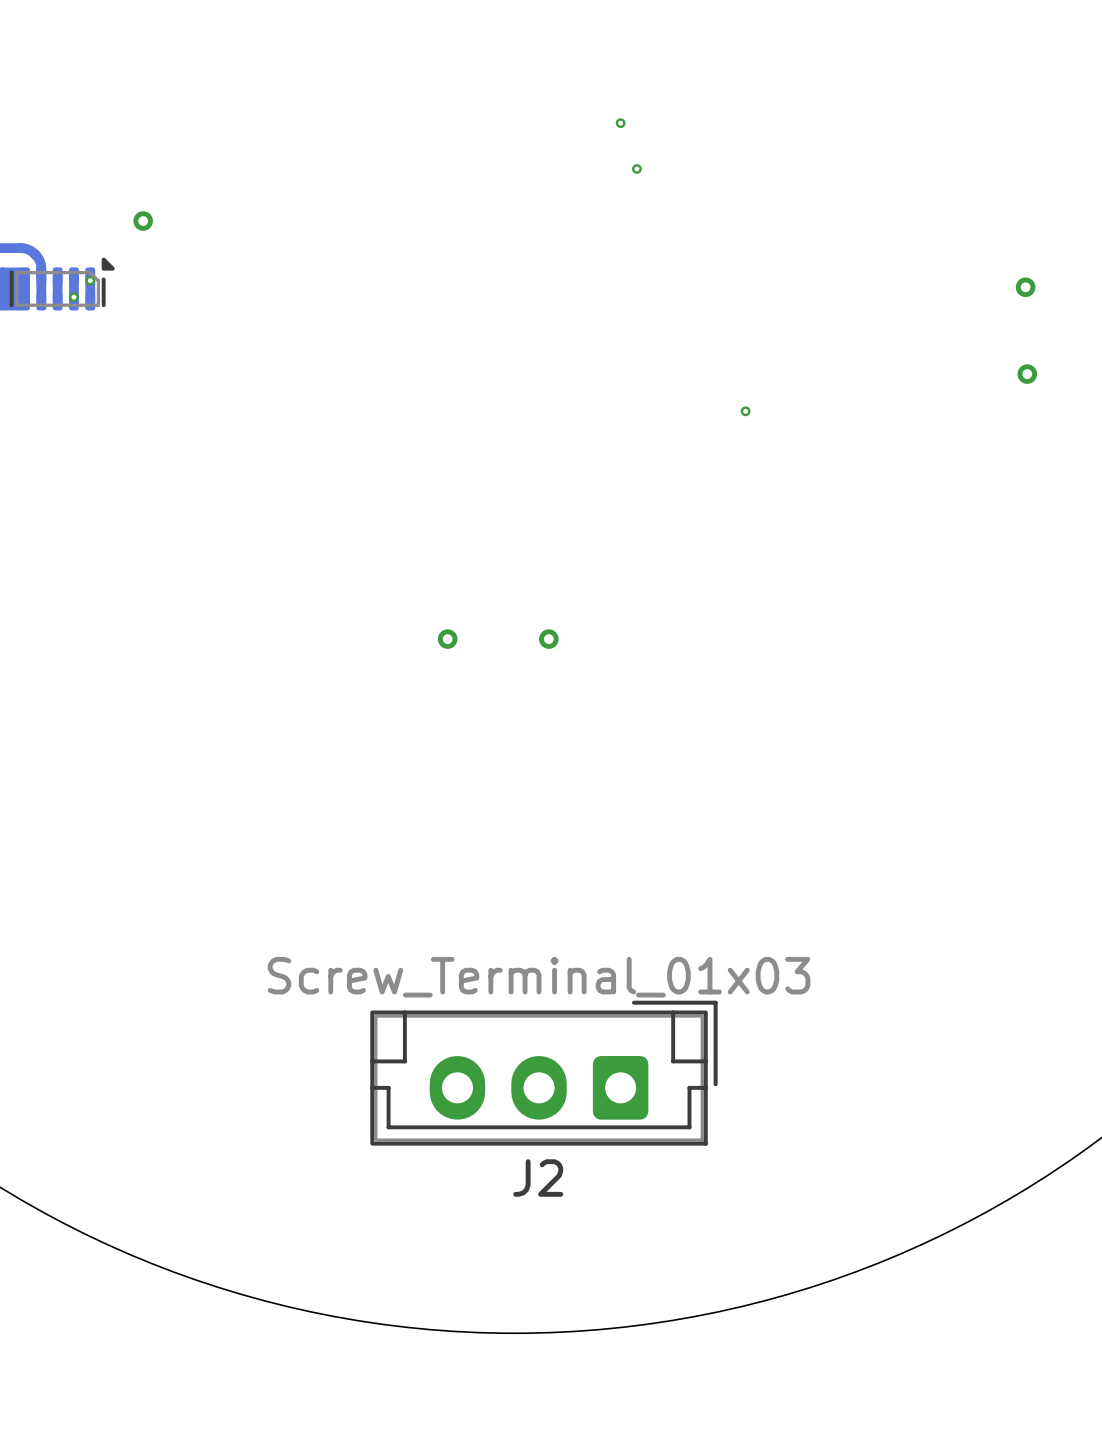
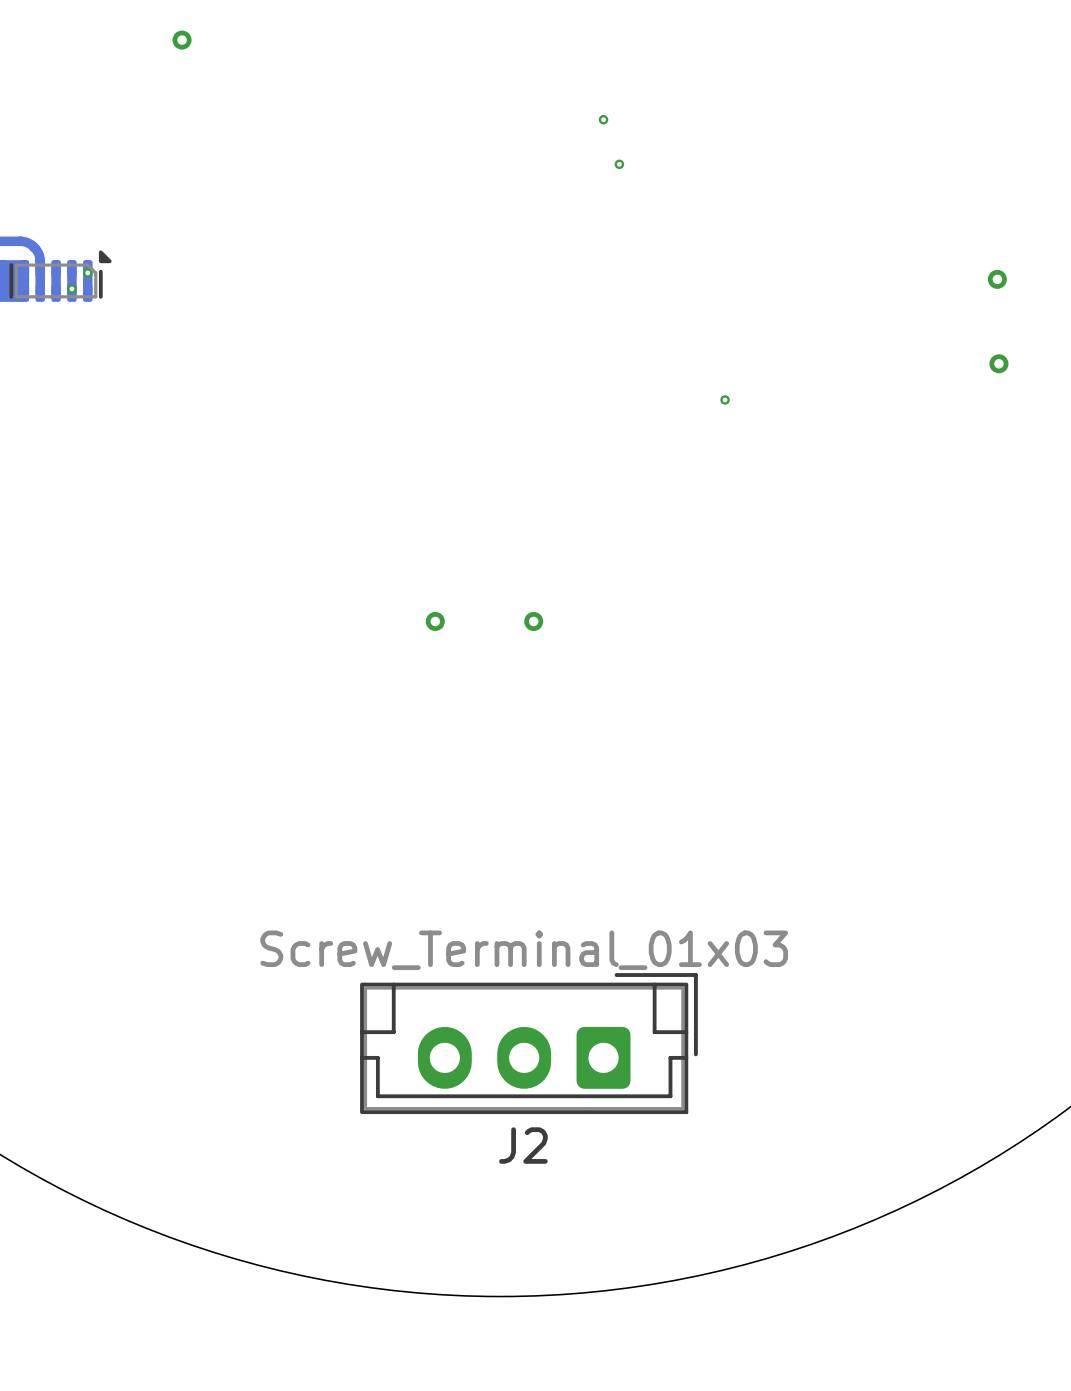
via position: (143, 221) -> (182, 40)

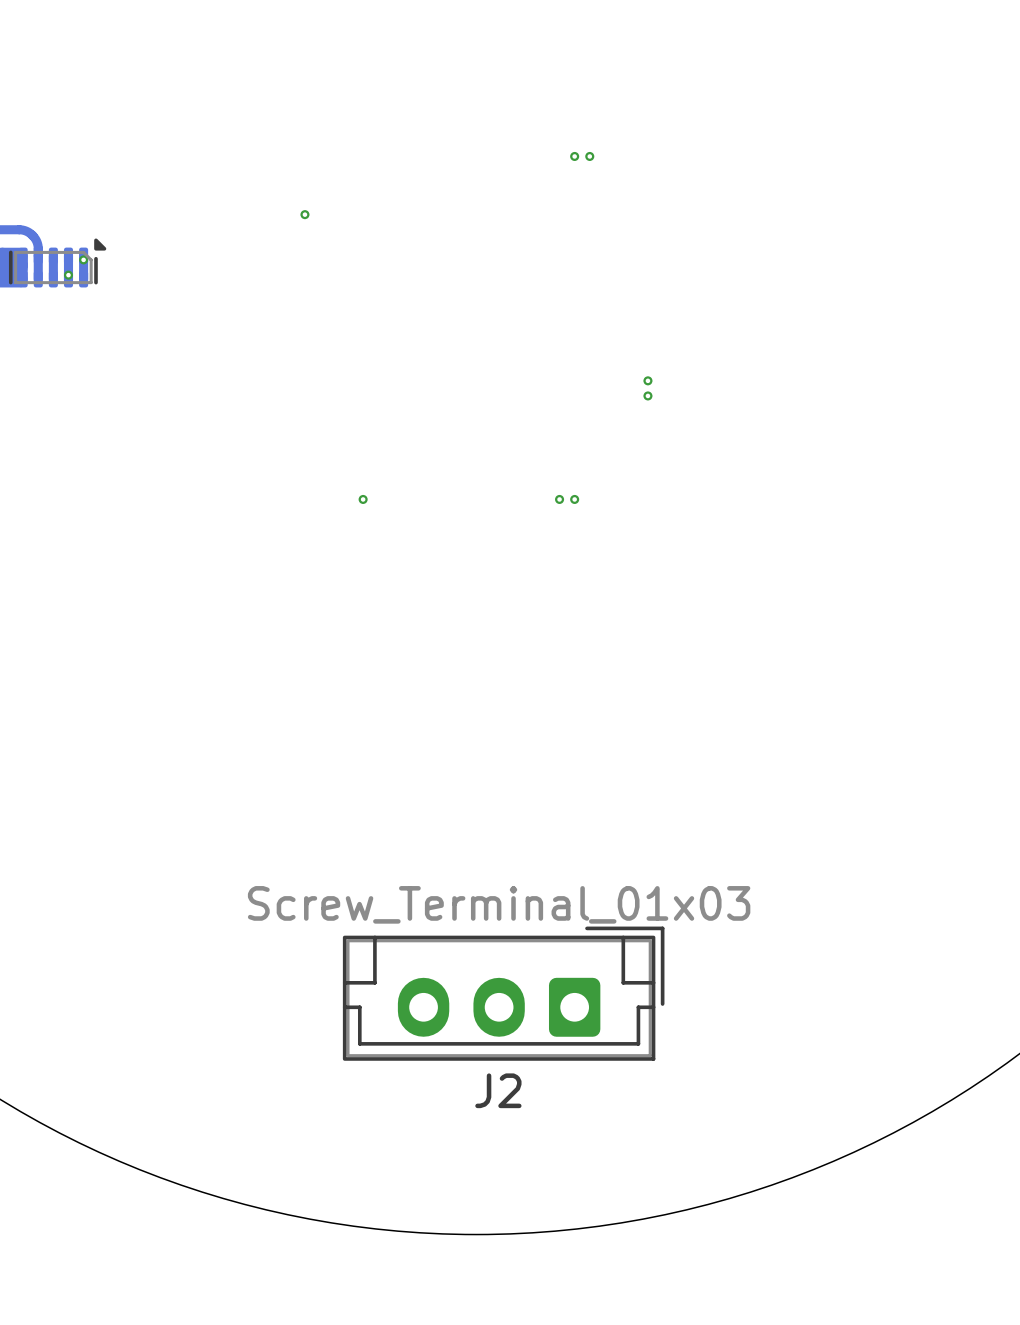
via: (182, 40) -> none
via position: (603, 119) -> (574, 156)
via: none -> (304, 214)
via: (997, 279) -> none
via: (998, 363) -> none
via: none -> (647, 380)
via: (725, 399) -> none
via: none -> (647, 395)
via: none -> (363, 499)
via: none -> (559, 499)
via: none -> (574, 499)
via: (435, 621) -> none
via: (533, 621) -> none

